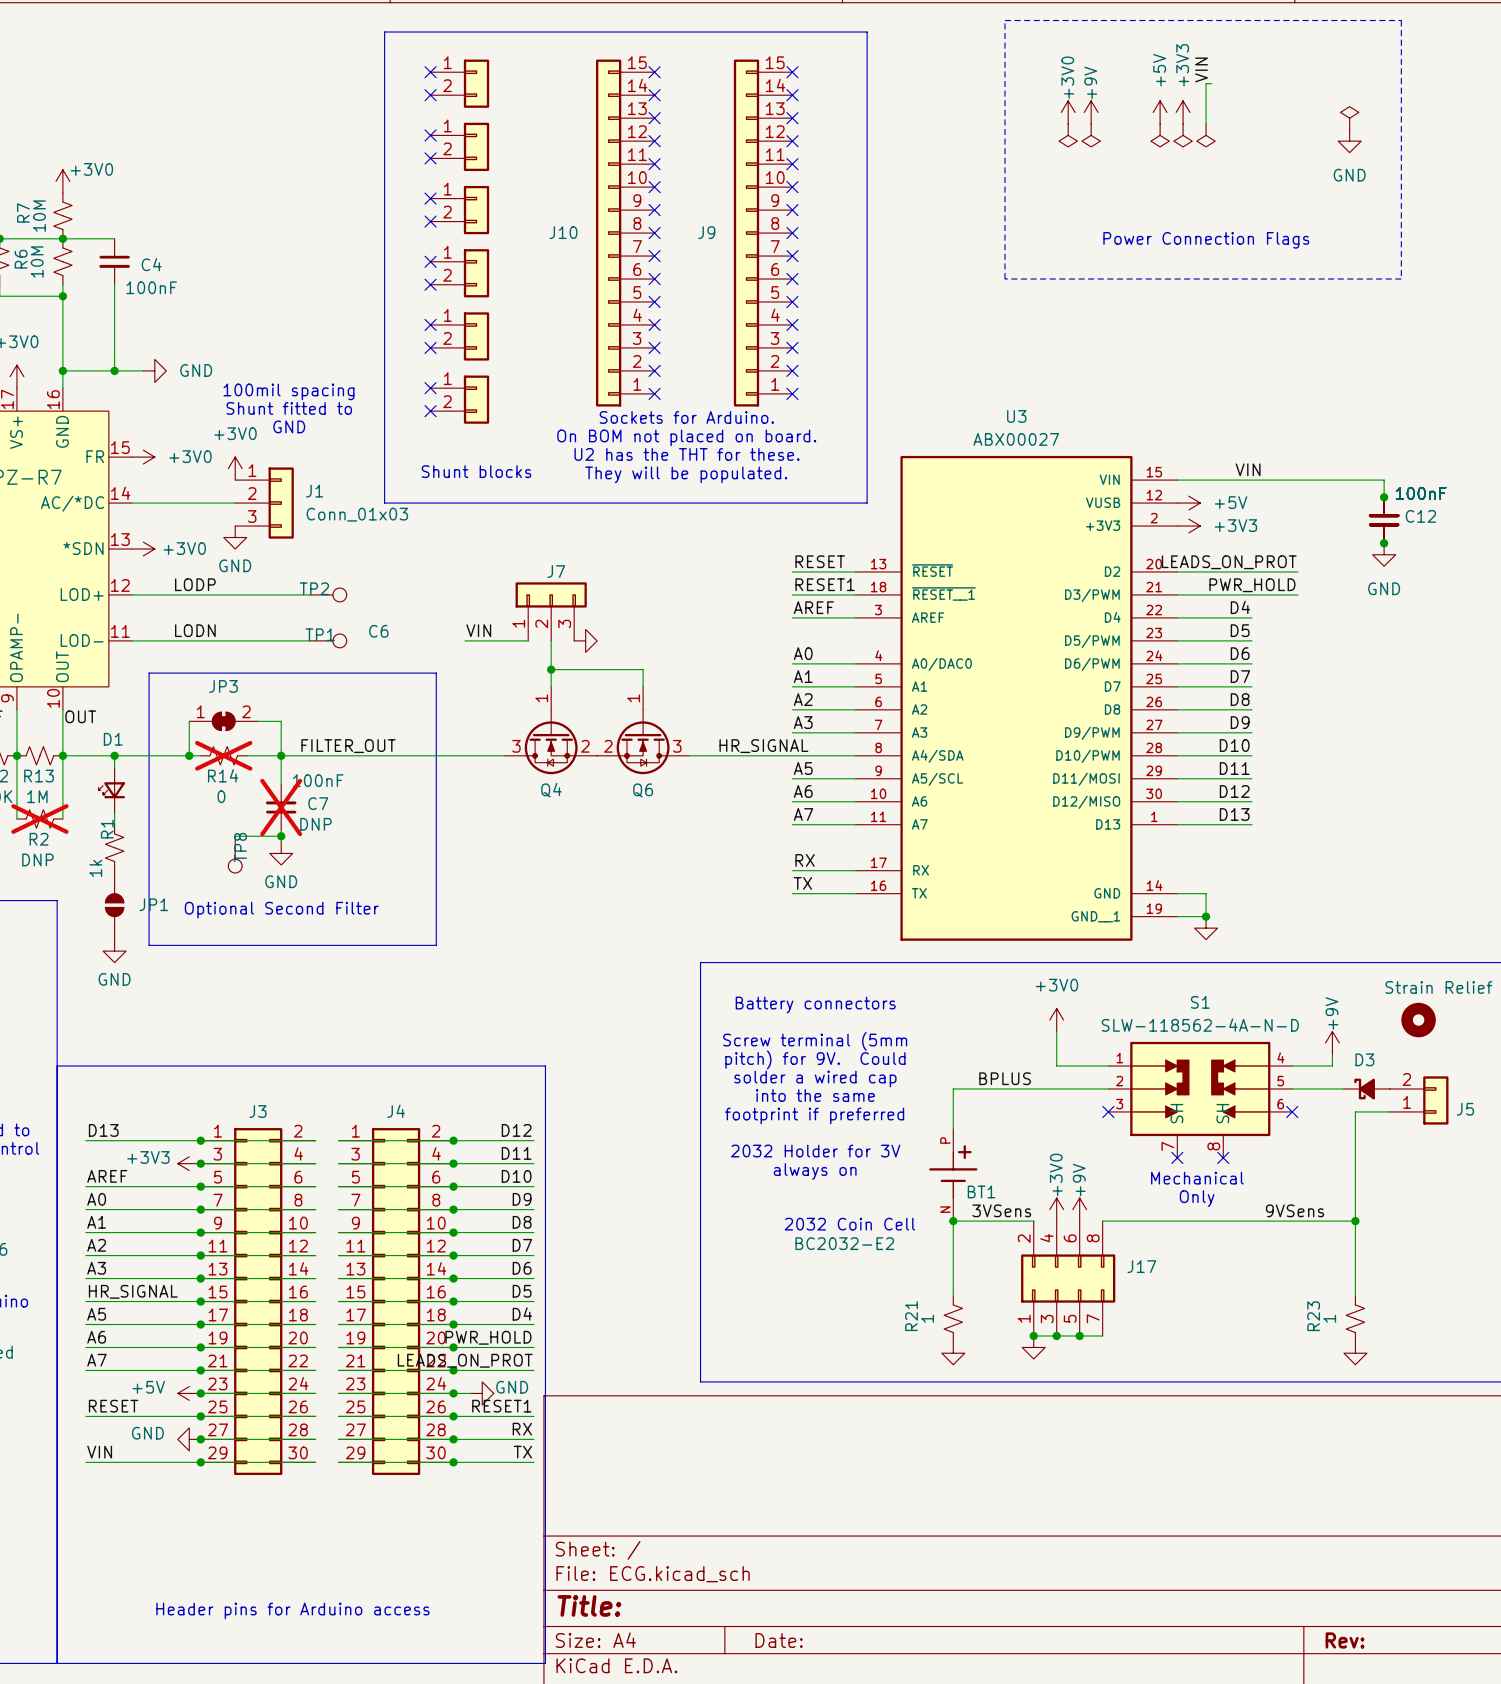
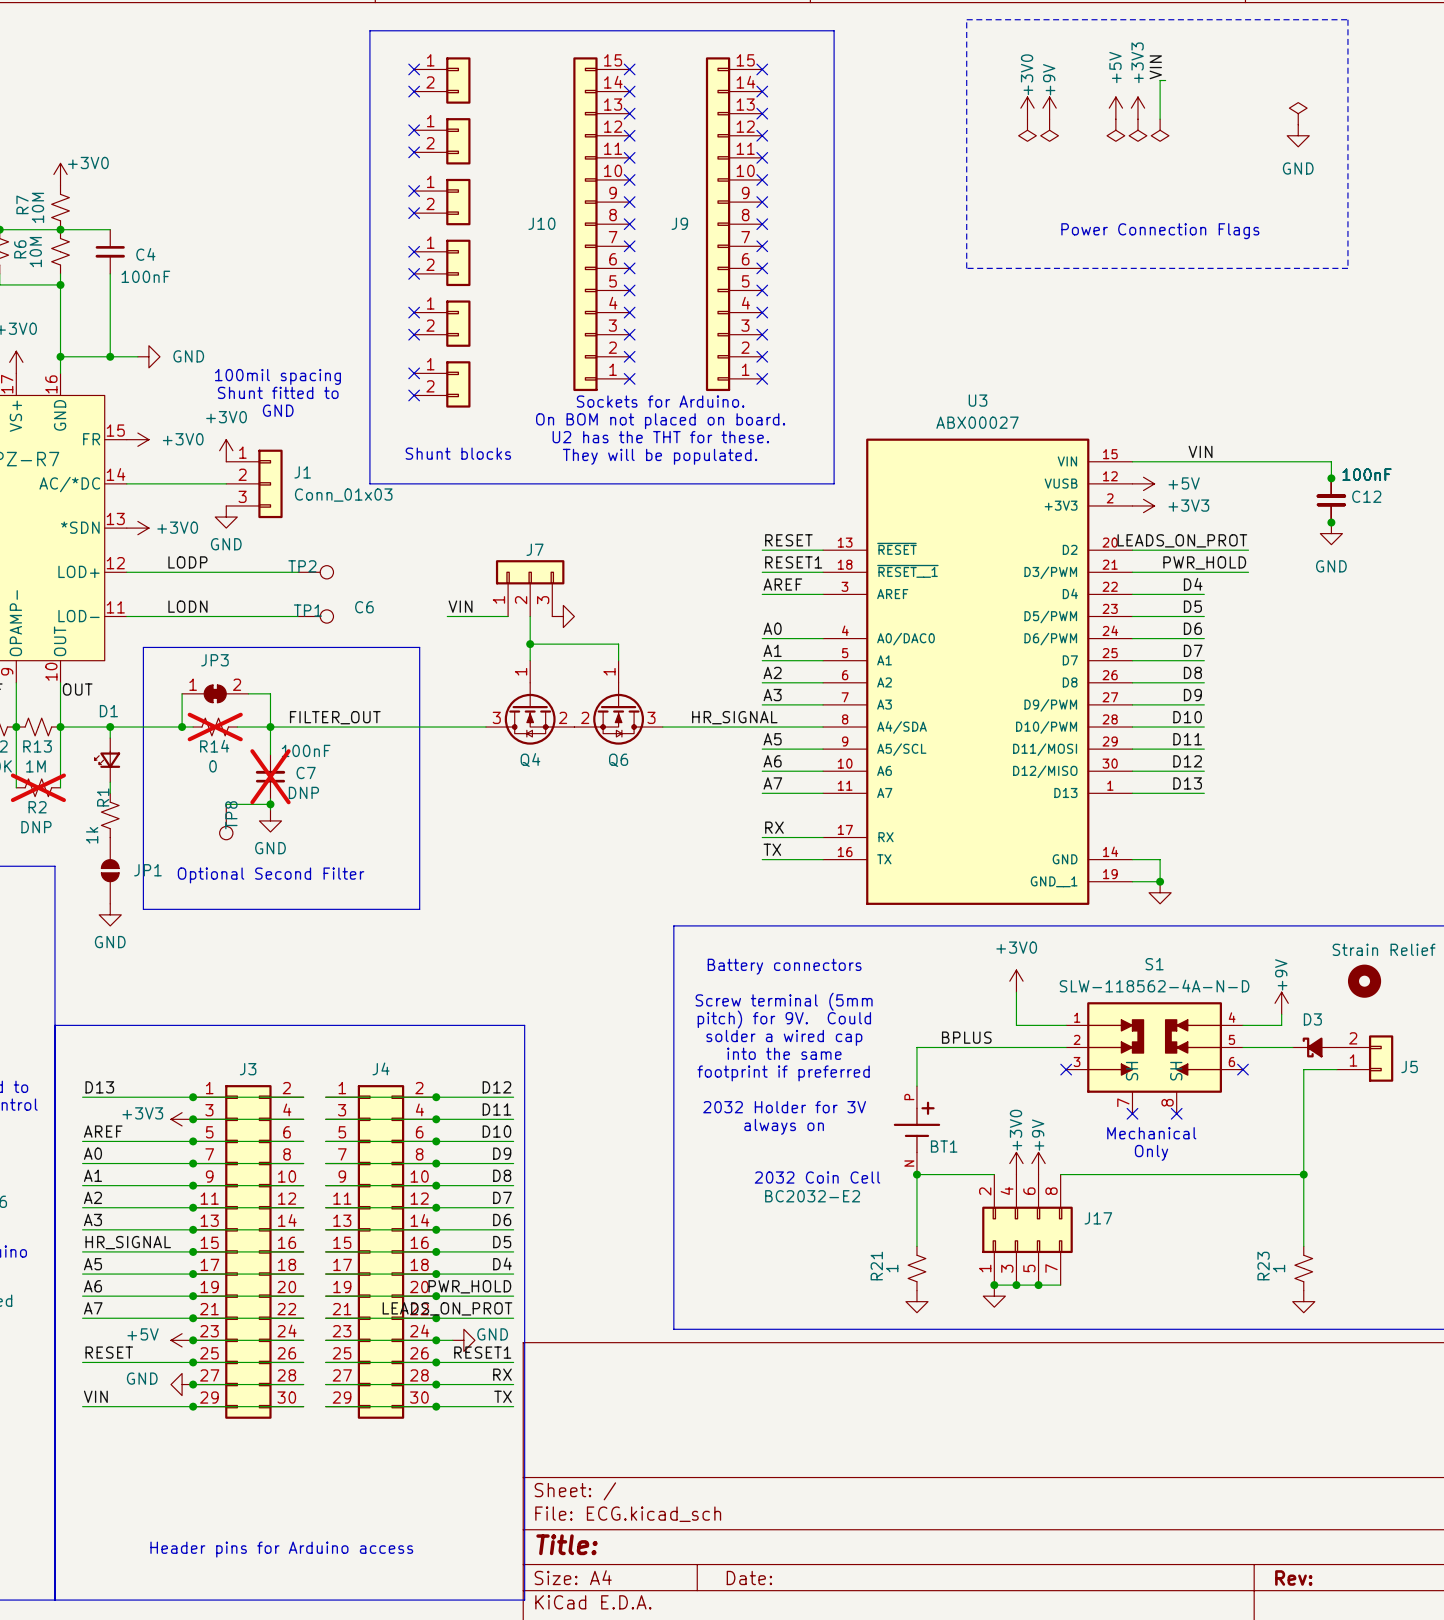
label: 3VSens (1001, 1210) -> none
label: 9VSens (1295, 1210) -> none

